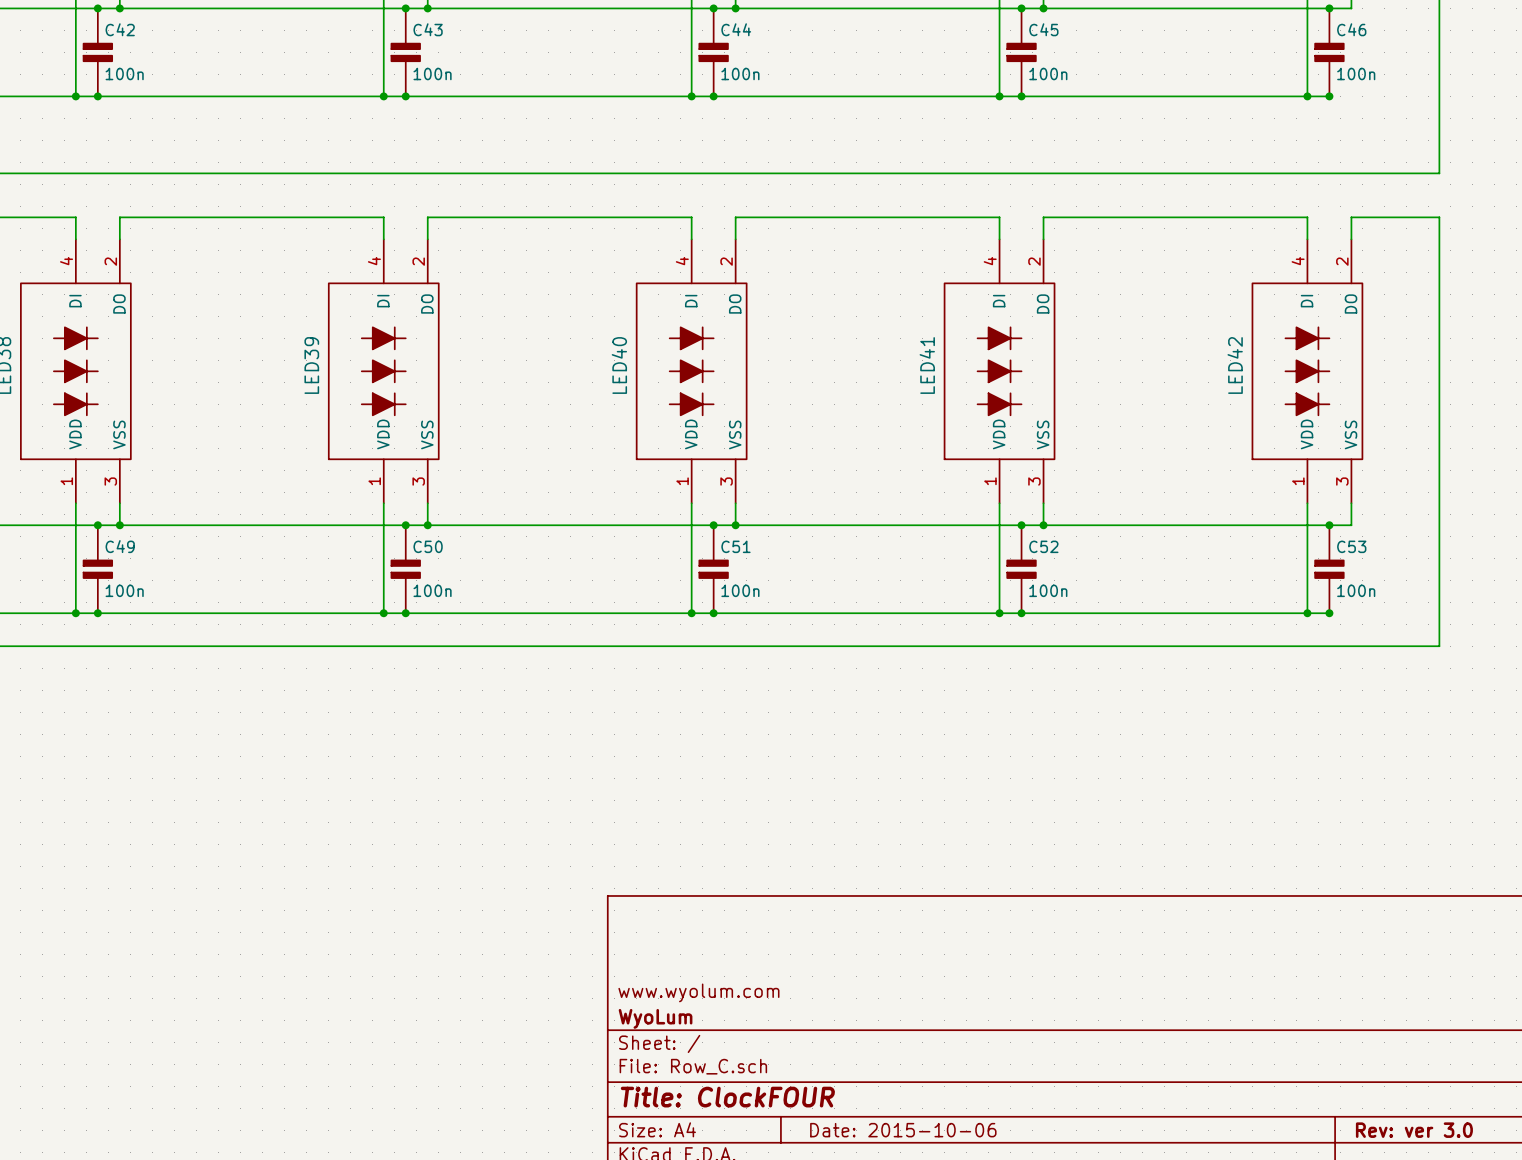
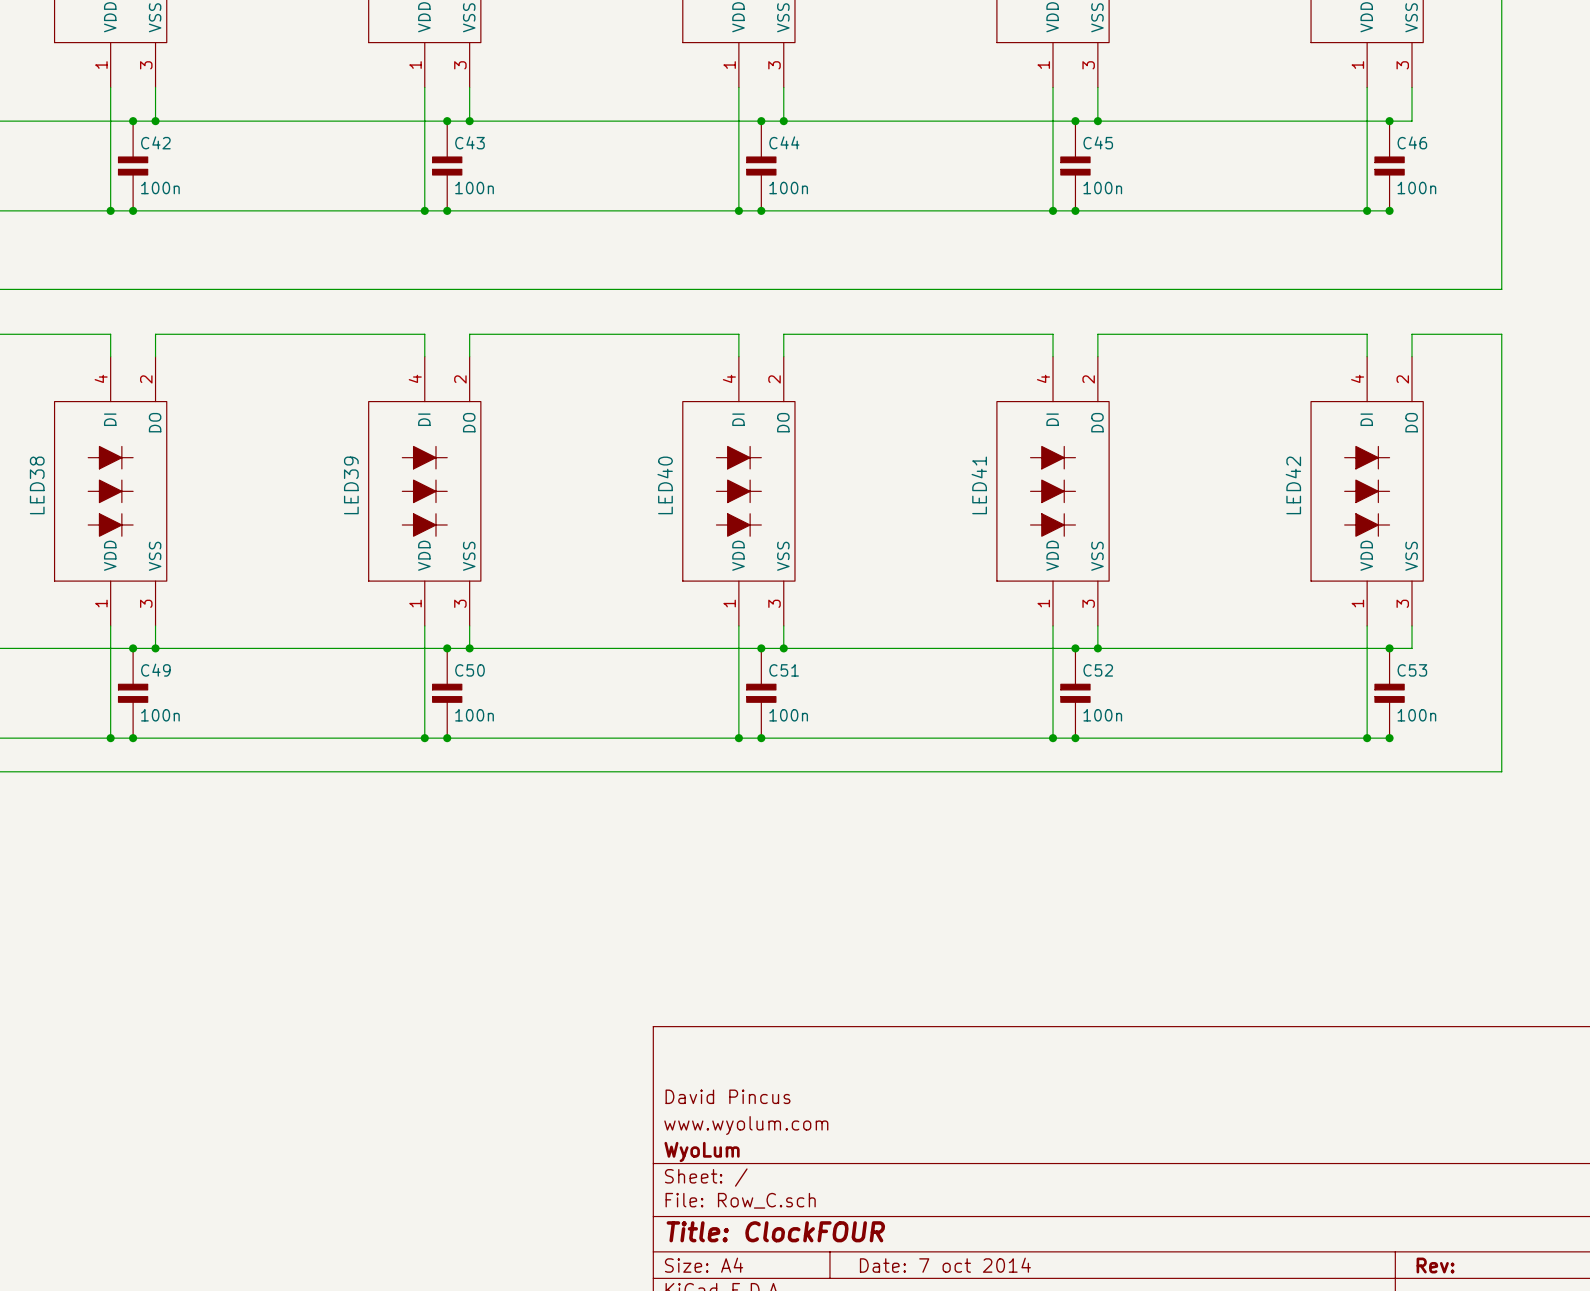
title block: none -> David Pincus (728, 1096)
title block: Date: 2015-10-06 (903, 1130) -> Date: 7 oct 2014 (945, 1265)
title block: Rev: ver 3.0 (1414, 1130) -> Rev: (1435, 1265)

